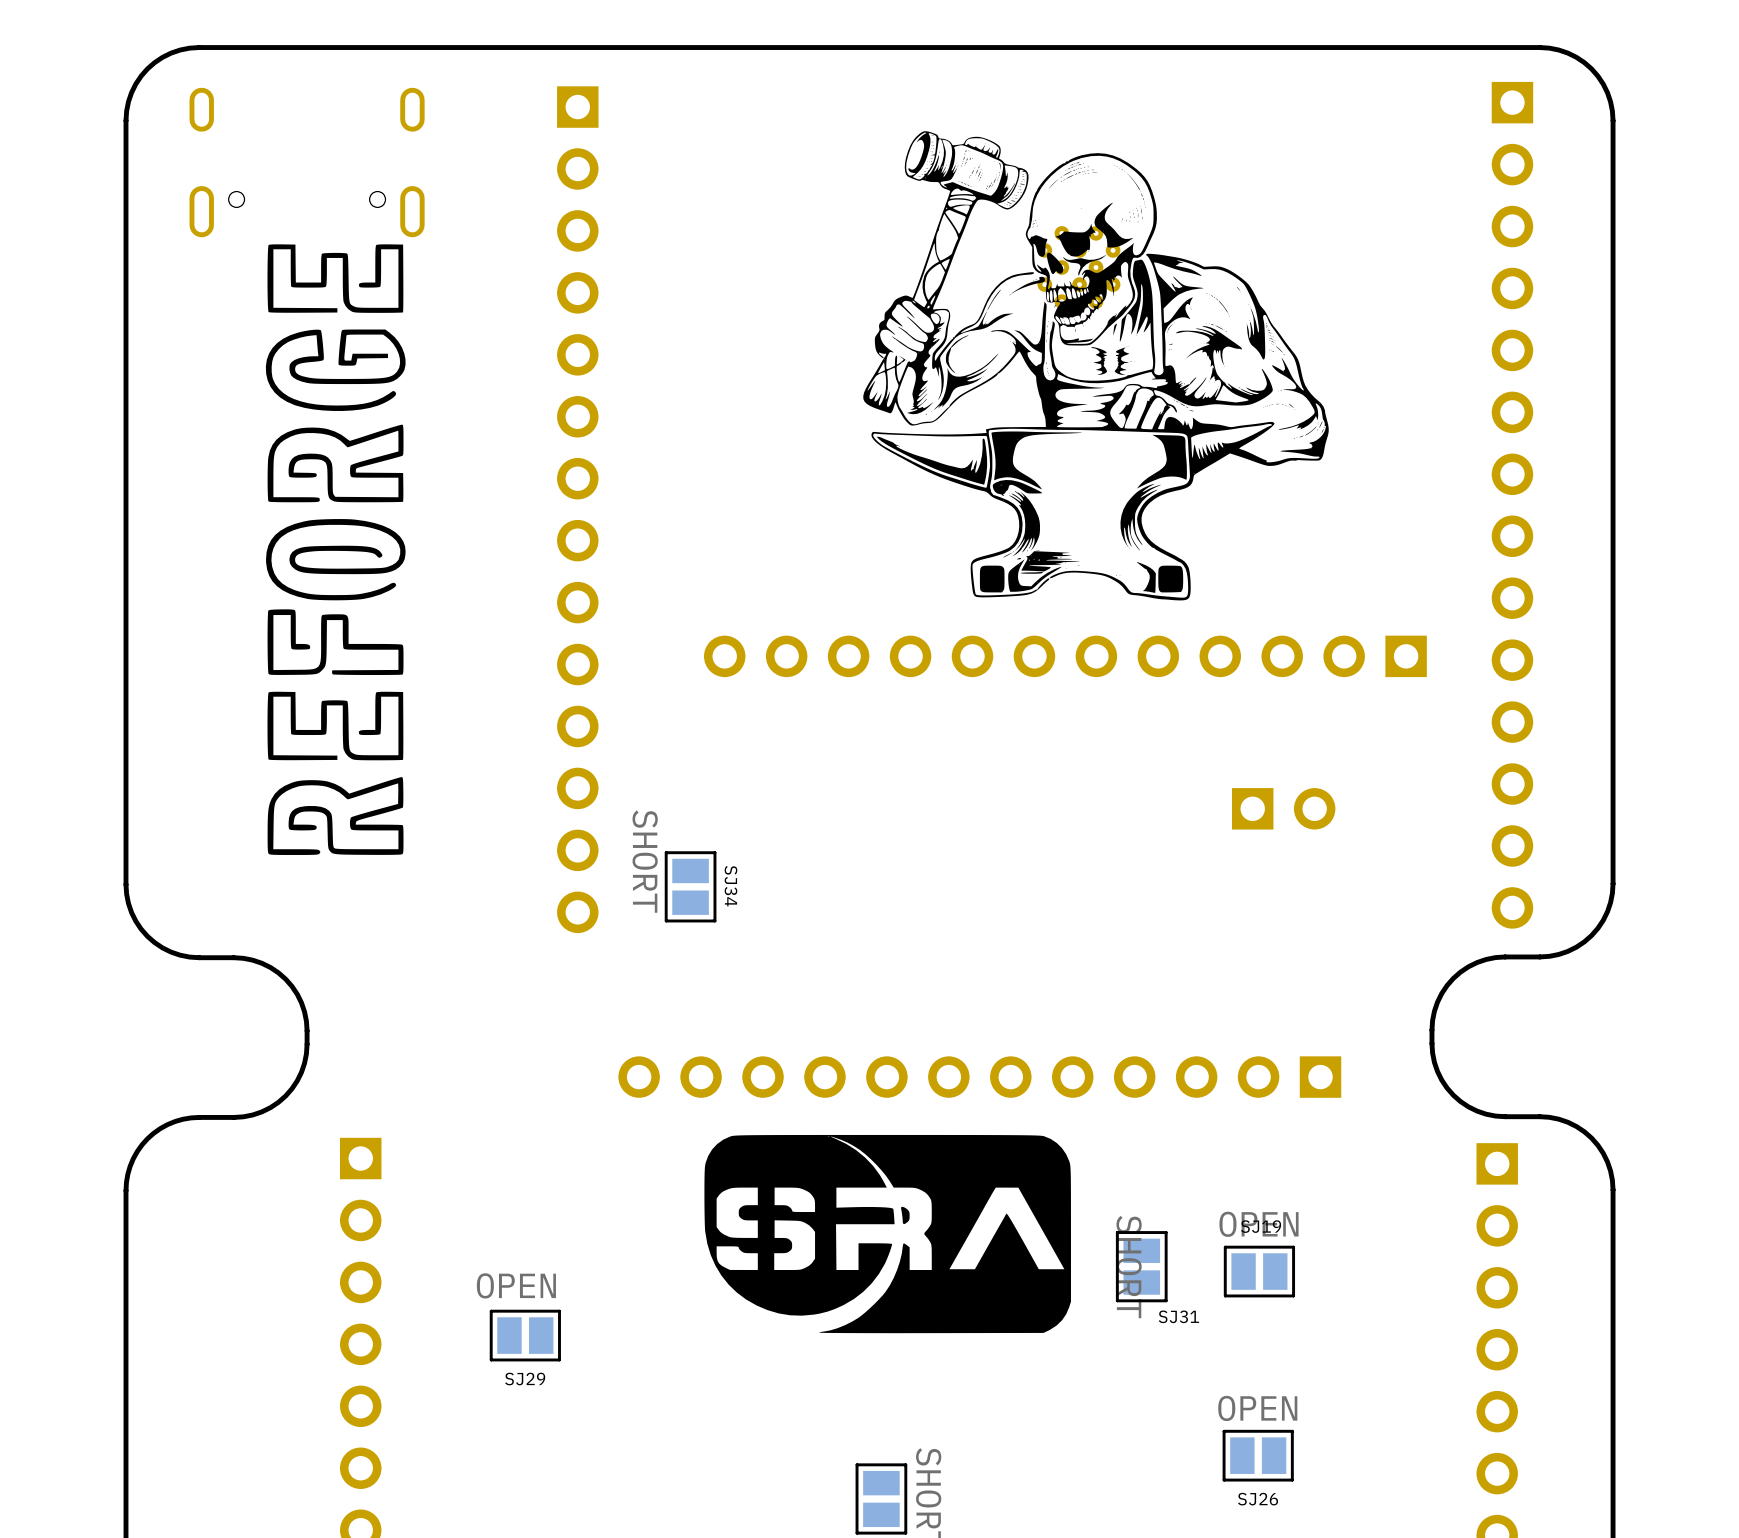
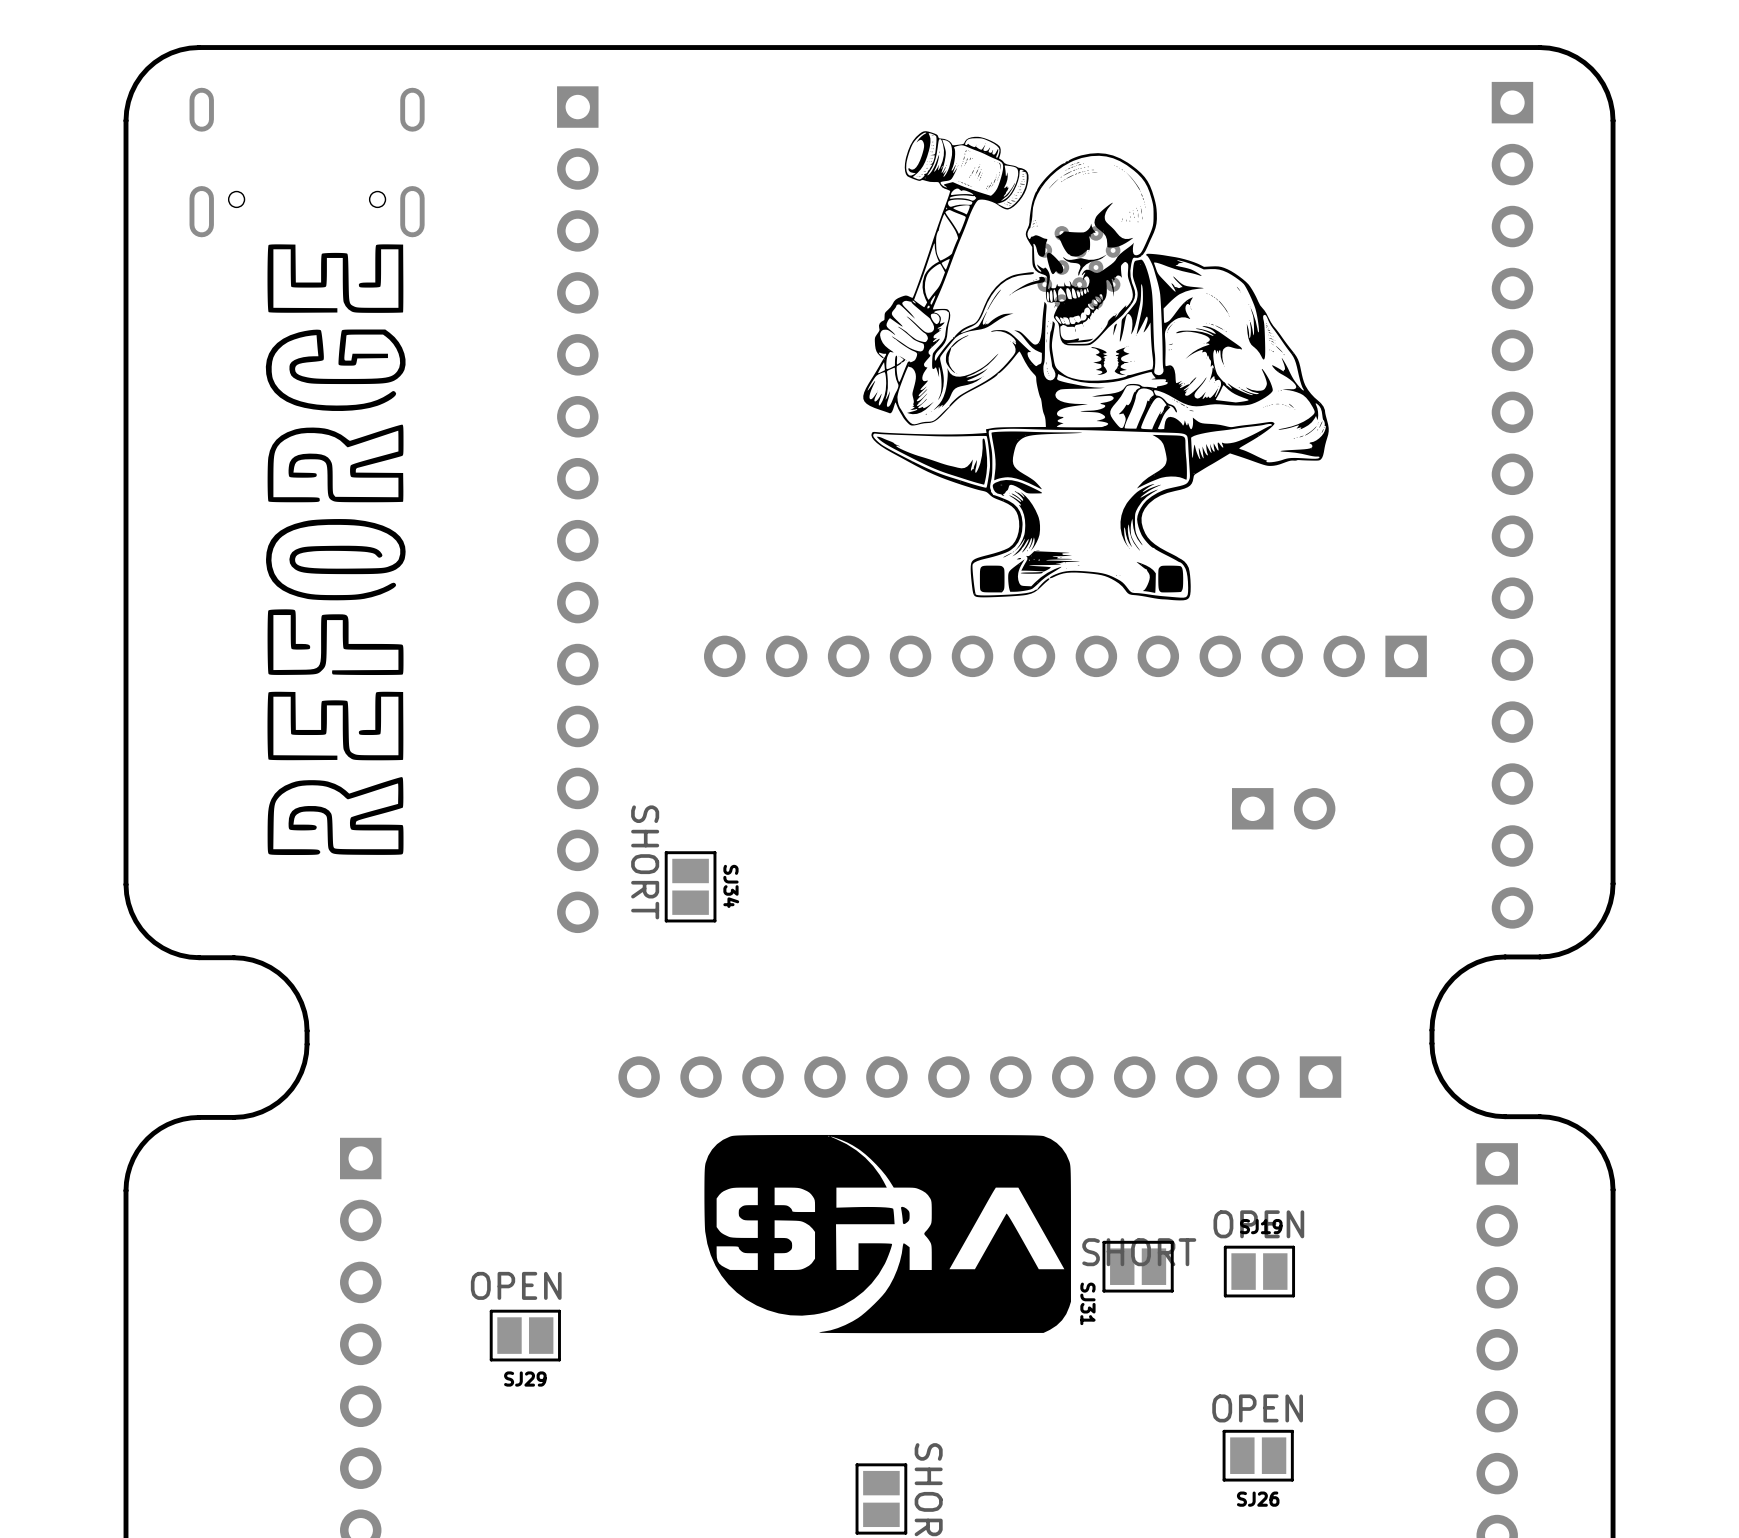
SJ31 rotation: 0° (1141, 1266) -> 90° clockwise (1138, 1266)

